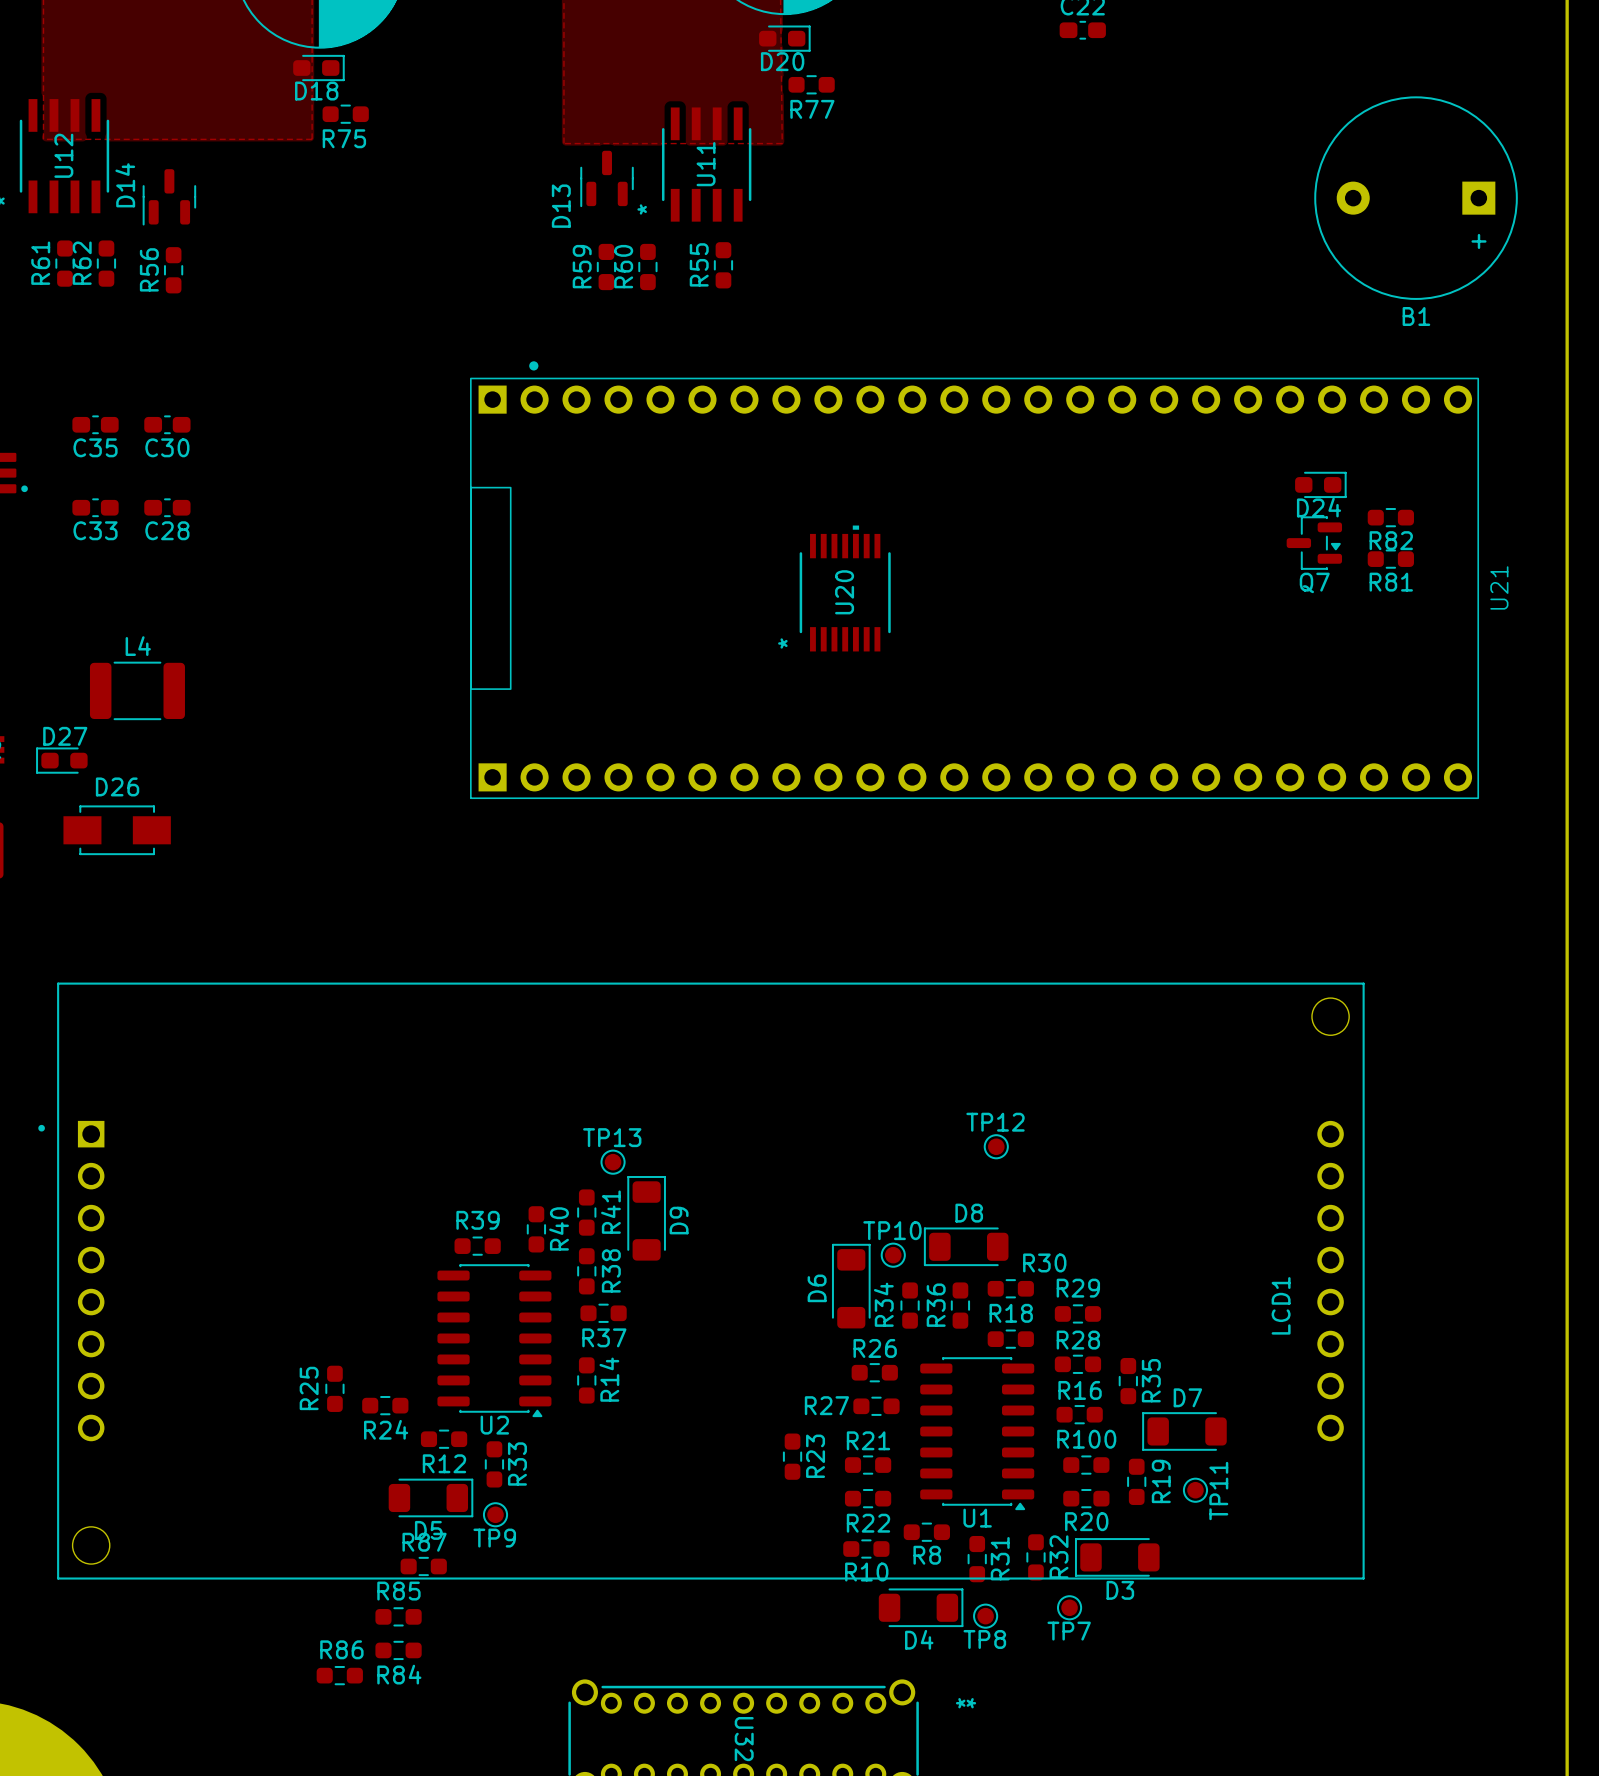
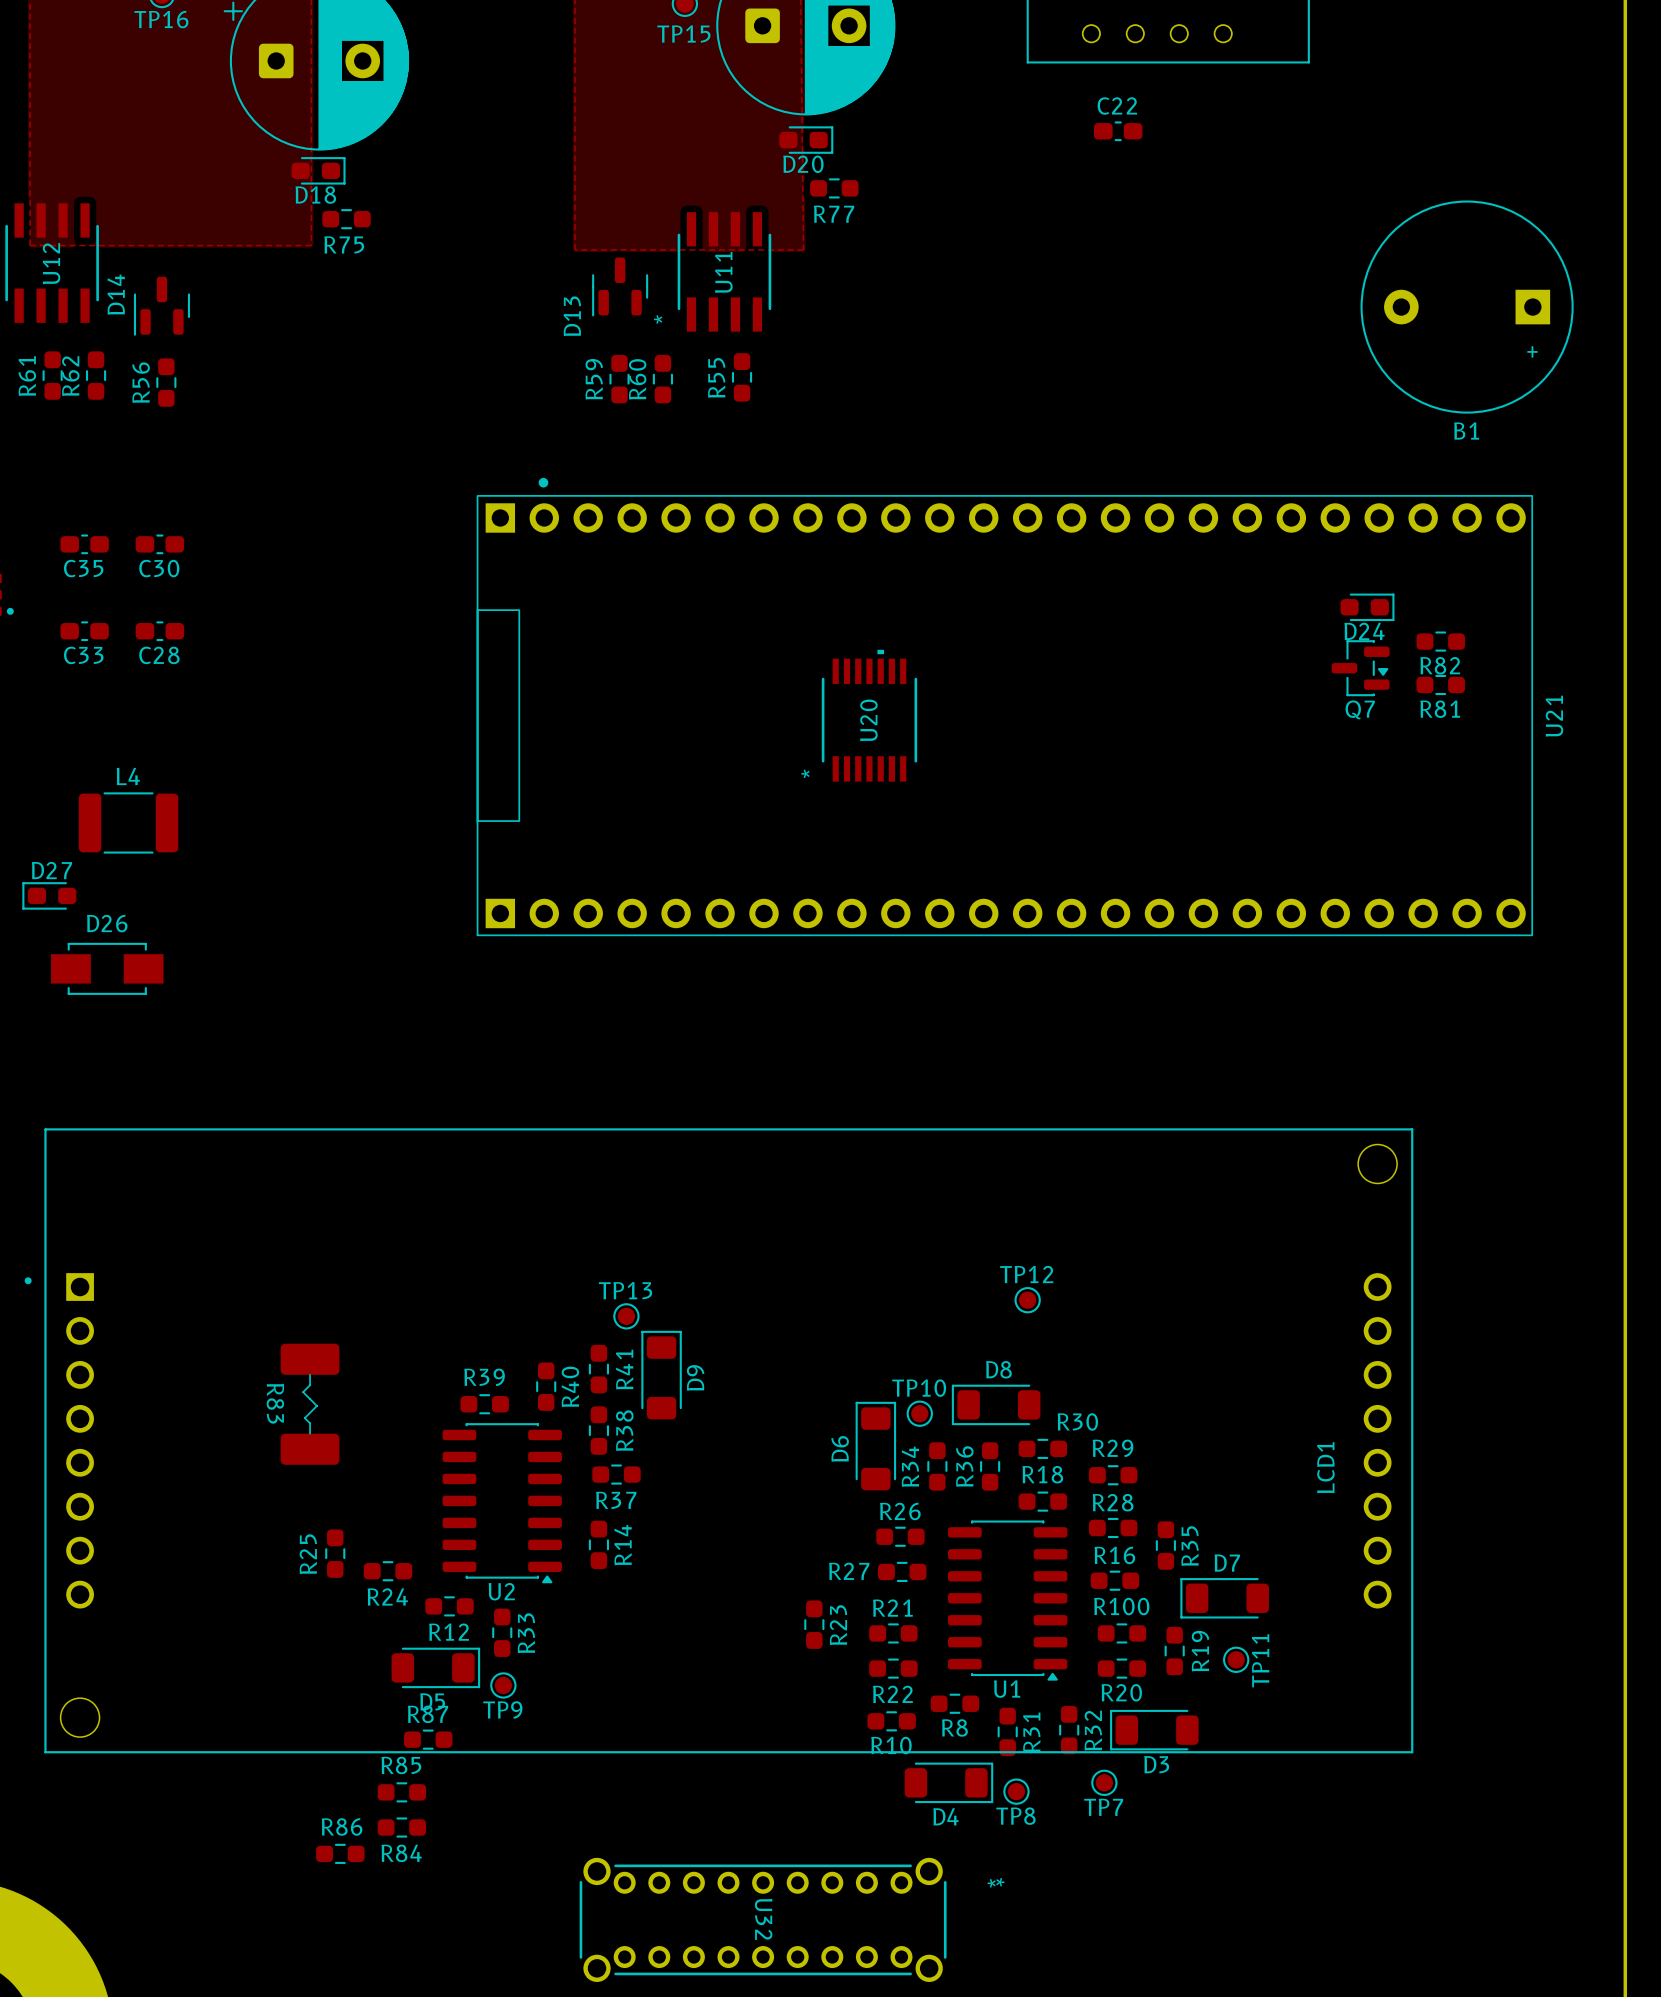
R83: none -> (310, 1404)

